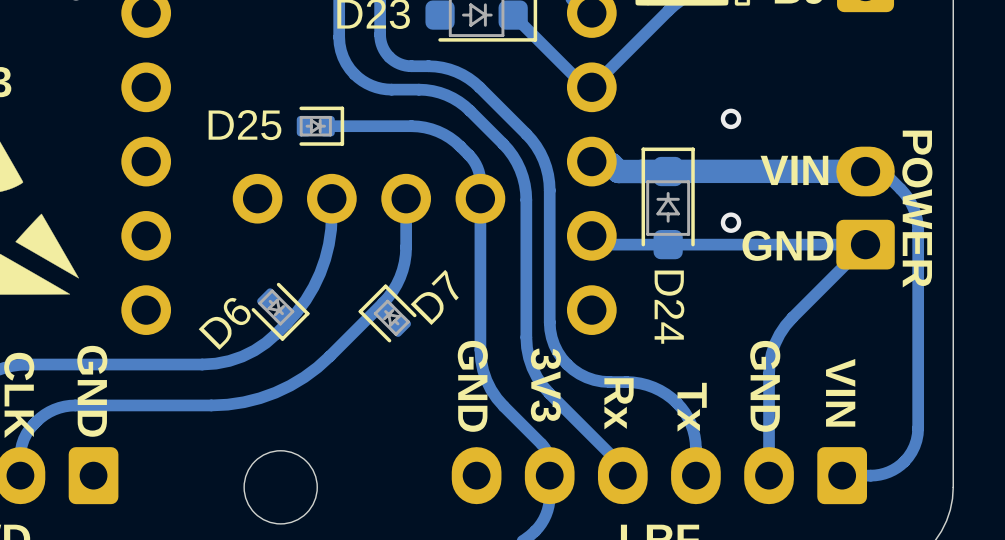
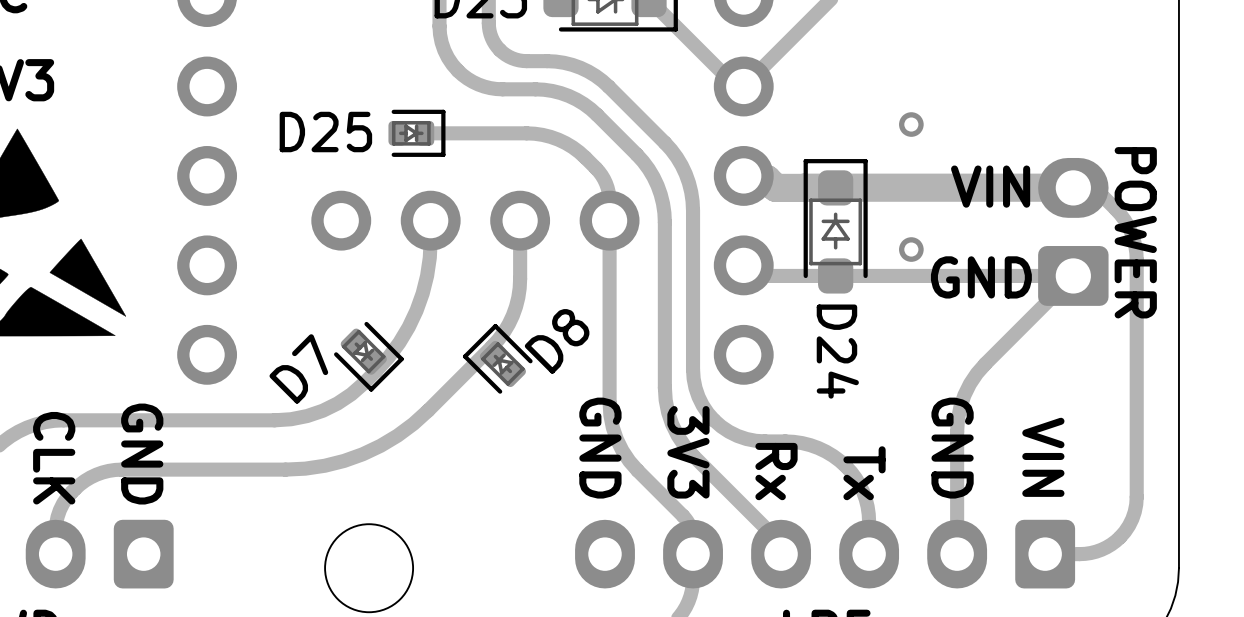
D7 name: D7 (434, 297) -> D8 (557, 341)
D6 name: D6 (224, 322) -> D7 (298, 368)

